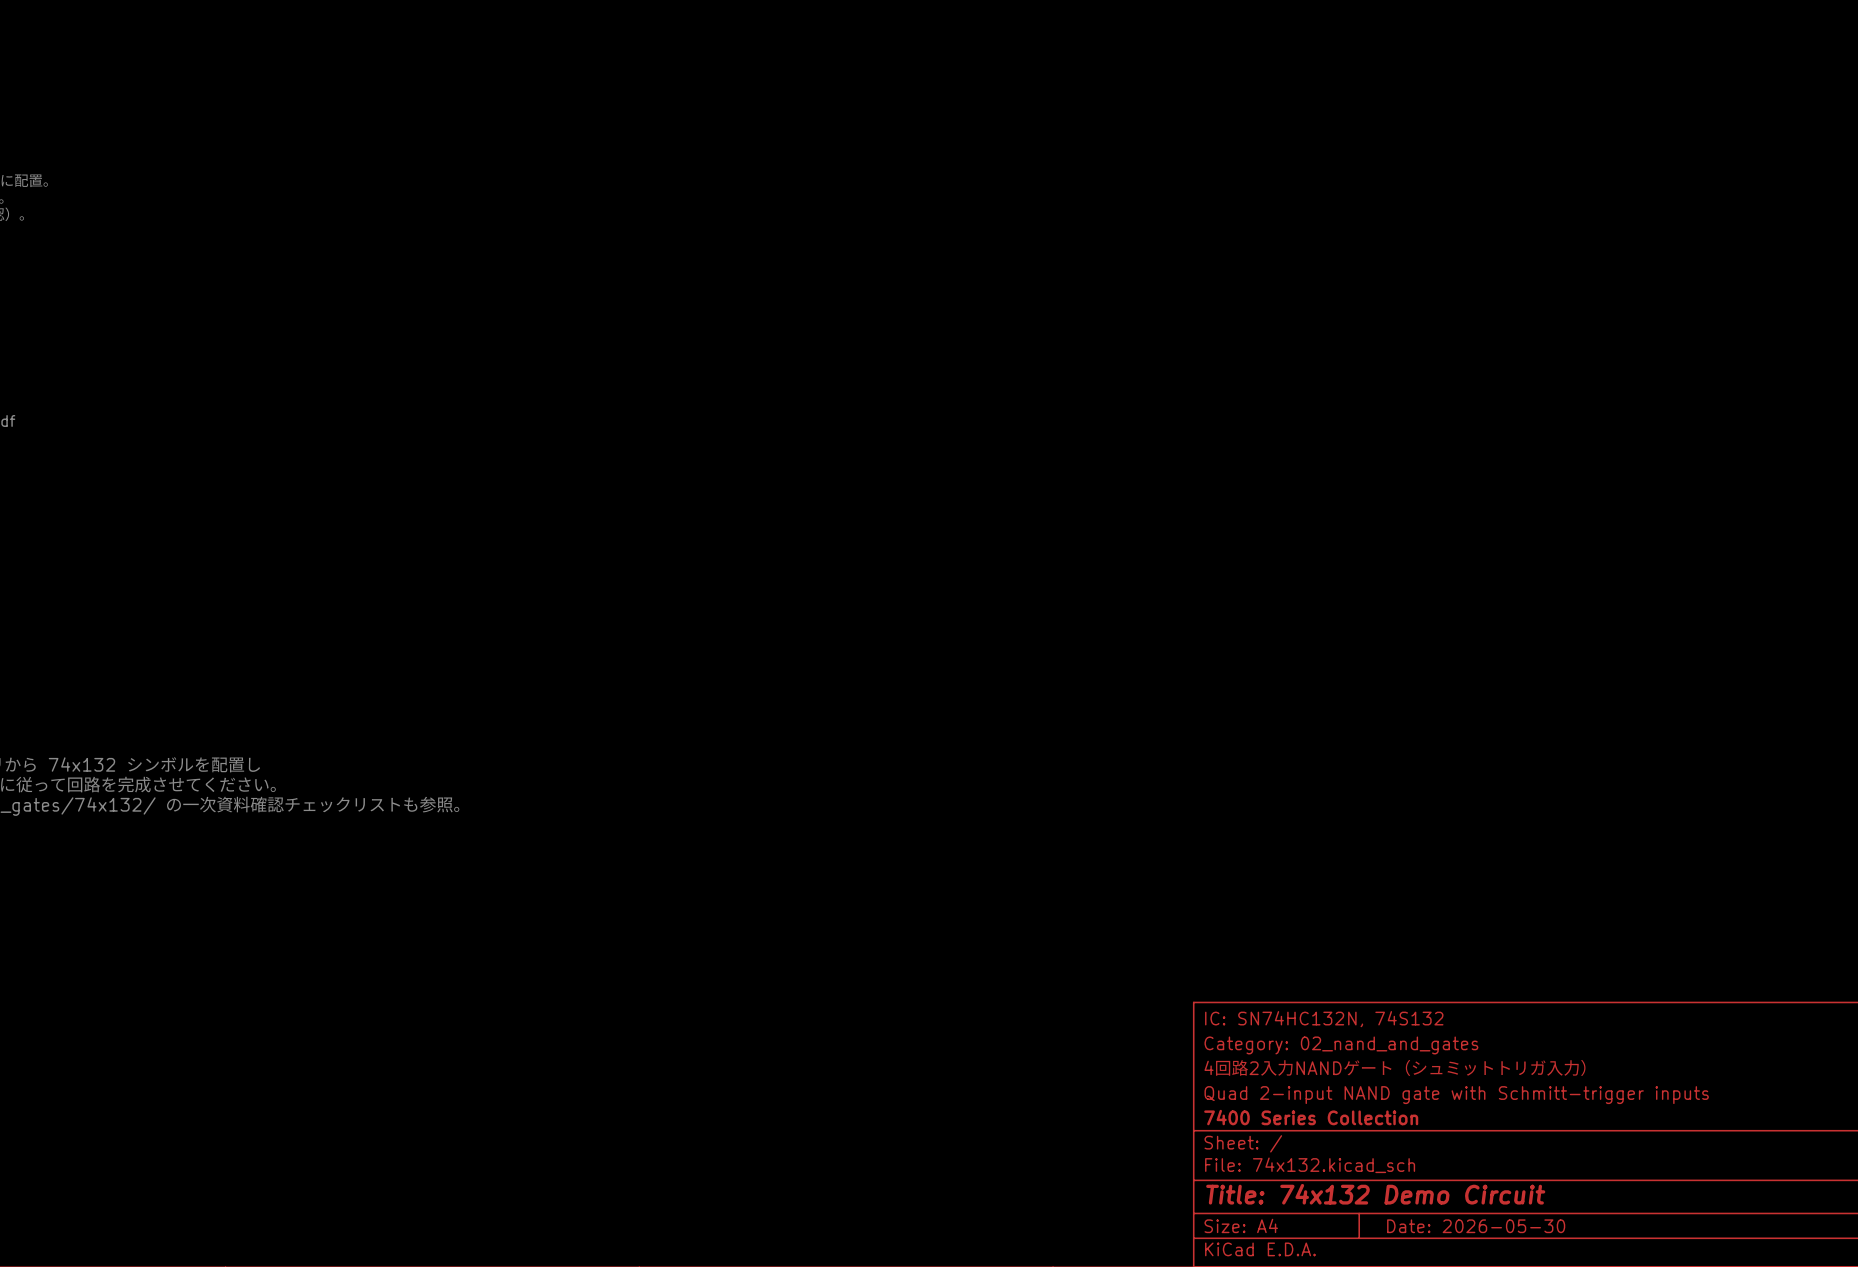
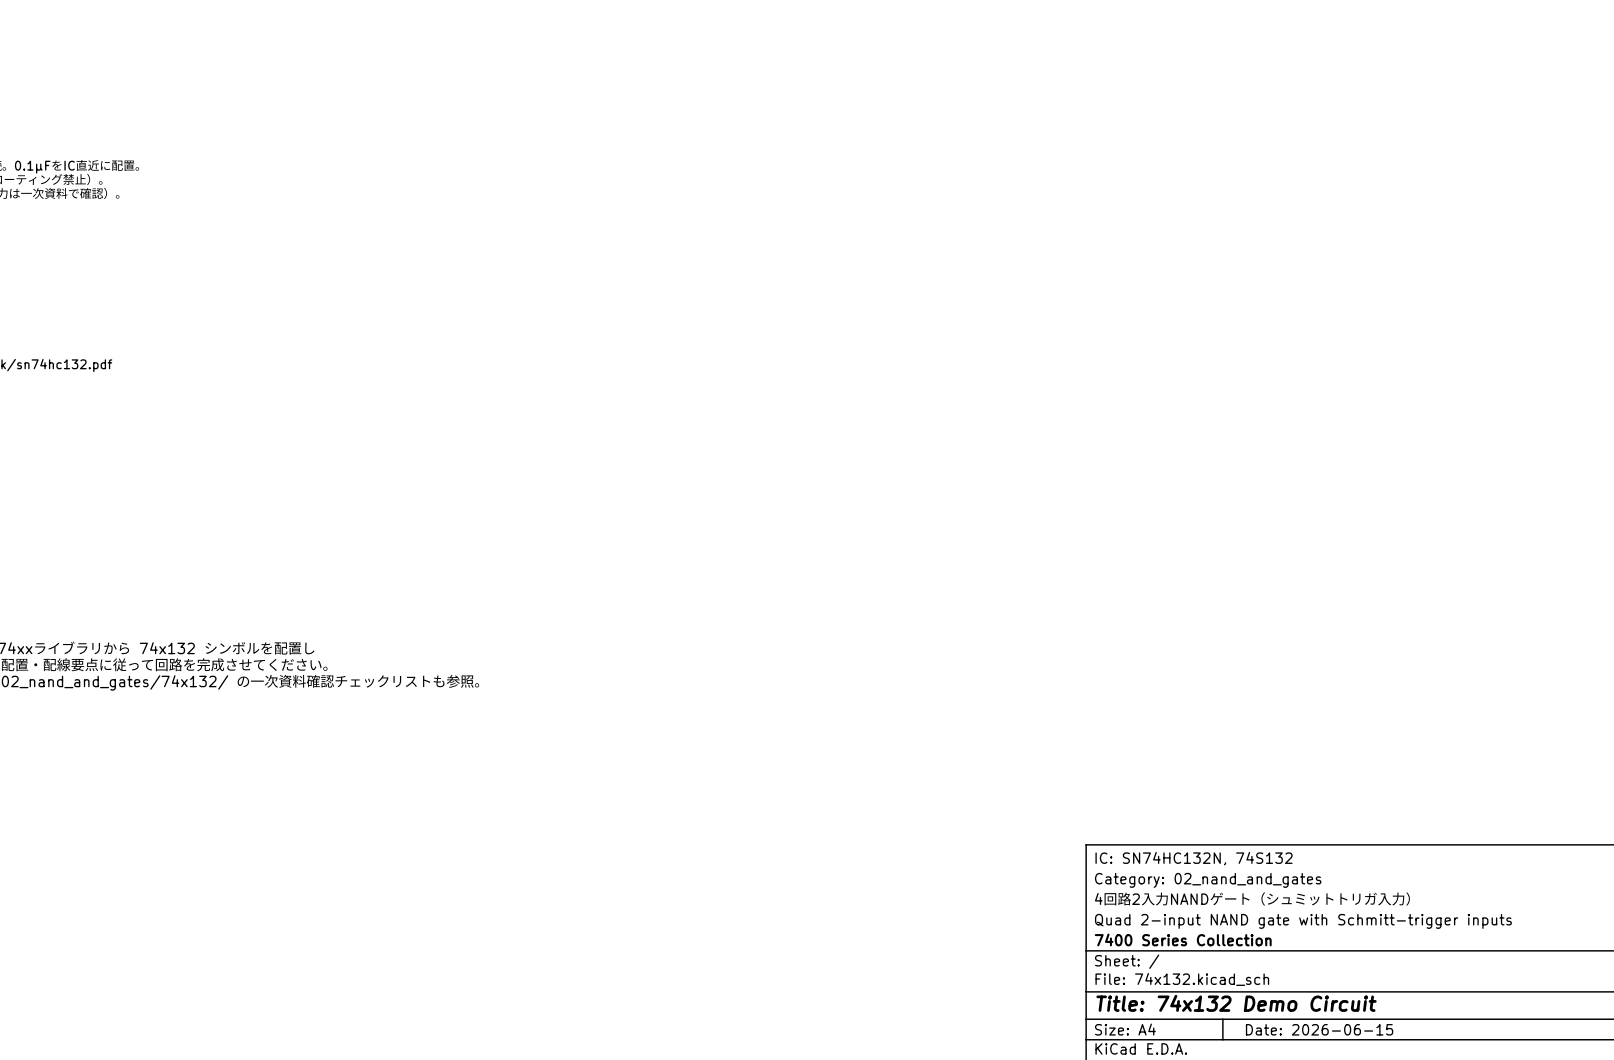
title block: Date: 2026-05-30 (1476, 1226) -> Date: 2026-06-15 (1319, 1029)

